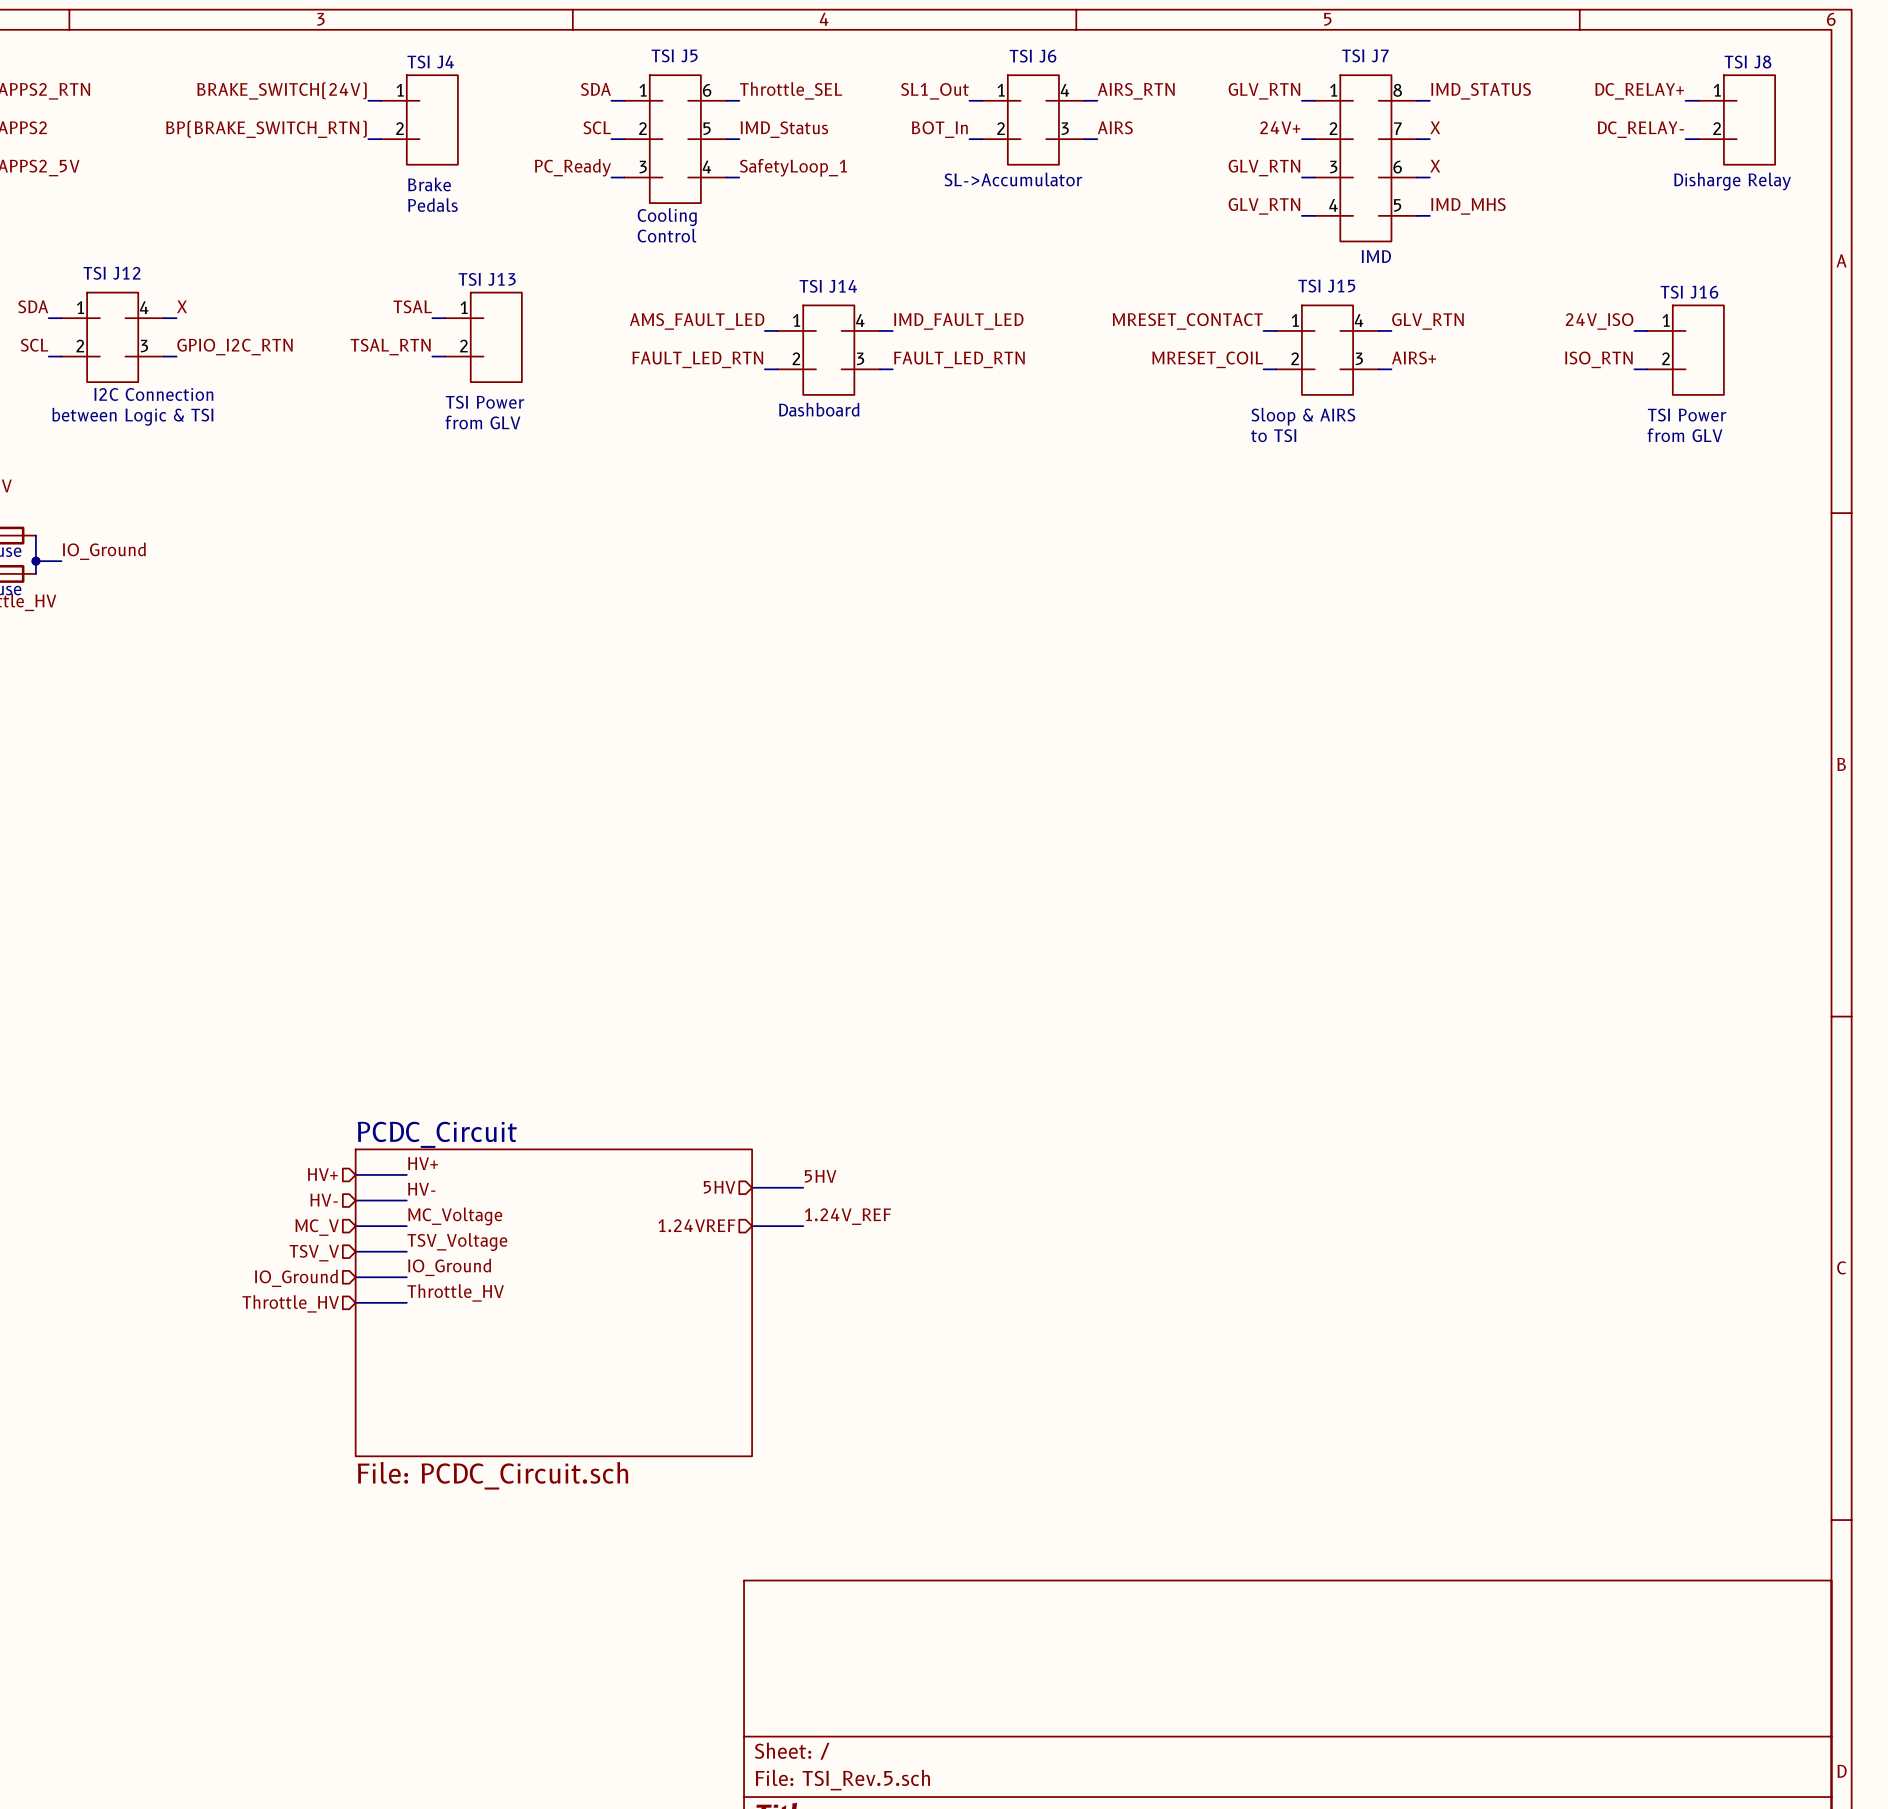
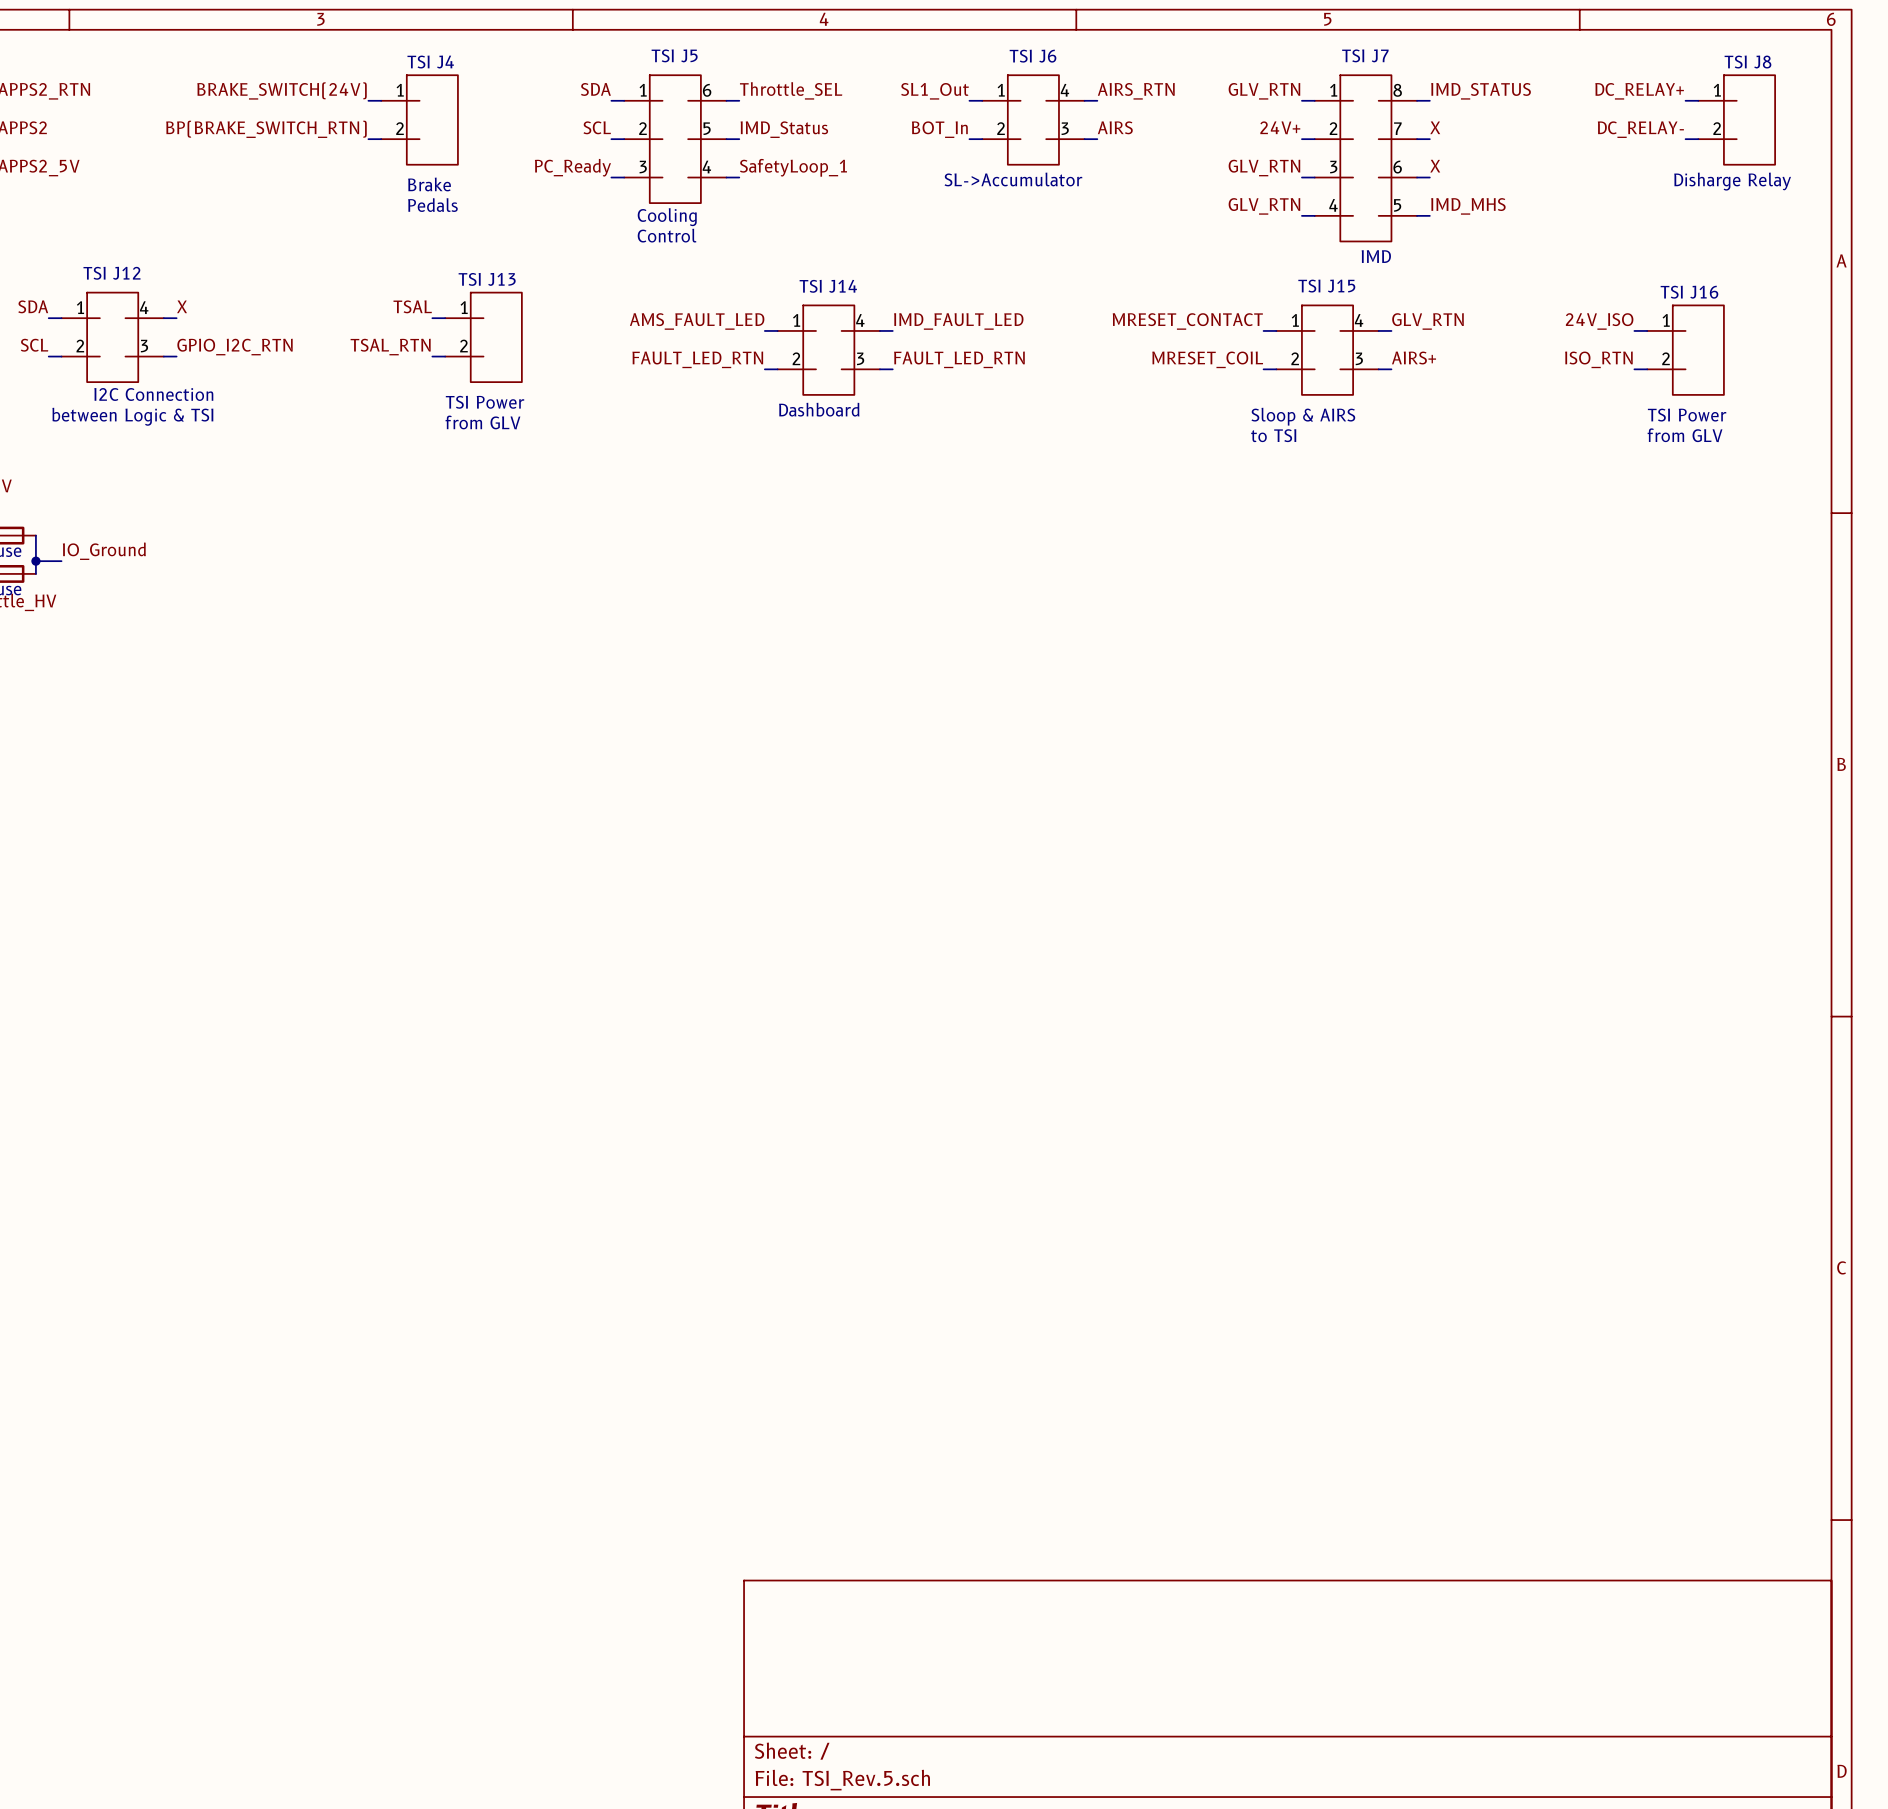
label: HV+ (422, 1163) -> none
hierarchical label: HV+ (322, 1174) -> none
wire: (355, 1174) (406, 1174) -> none
label: 5HV (820, 1176) -> none
hierarchical label: 5HV (719, 1187) -> none
wire: (752, 1187) (803, 1187) -> none
label: HV- (421, 1189) -> none
hierarchical label: HV- (324, 1200) -> none
wire: (355, 1200) (406, 1200) -> none
label: MC_Voltage (455, 1216) -> none
label: 1.24V_REF (847, 1216) -> none
hierarchical label: 1.24VREF (696, 1225) -> none
wire: (355, 1226) (406, 1226) -> none
wire: (752, 1226) (803, 1226) -> none
hierarchical label: MC_V (317, 1227) -> none
label: TSV_Voltage (457, 1242) -> none
wire: (355, 1251) (406, 1251) -> none
hierarchical label: TSV_V (314, 1253) -> none
label: IO_Ground (449, 1267) -> none
wire: (355, 1277) (406, 1277) -> none
hierarchical label: IO_Ground (296, 1278) -> none
label: Throttle_HV (455, 1292) -> none
wire: (355, 1302) (406, 1302) -> none
sheet PCDC_Circuit: File: PCDC_Circuit.sch (553, 1302) -> none
hierarchical label: Throttle_HV (290, 1303) -> none

